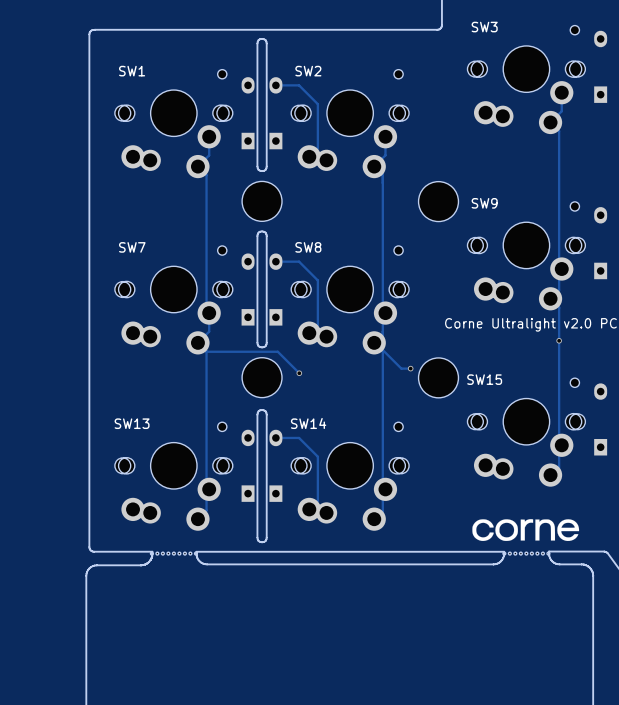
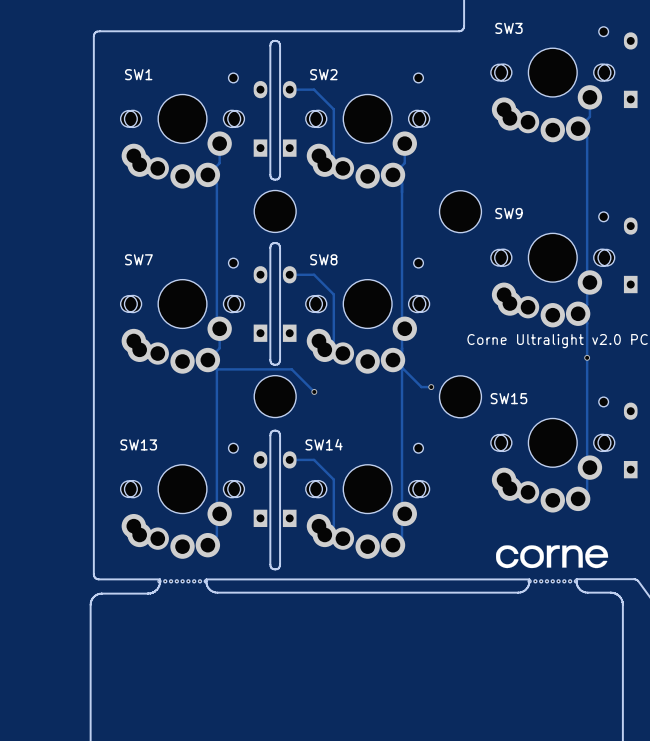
SW3 footprint: [467, 25, 586, 135] -> [490, 26, 615, 143]
SW1 footprint: [114, 69, 233, 179] -> [120, 73, 245, 189]
SW2 footprint: [291, 69, 410, 179] -> [305, 73, 430, 189]
SW9 footprint: [467, 201, 586, 311] -> [490, 211, 615, 328]
SW7 footprint: [114, 245, 233, 355] -> [120, 258, 245, 374]
SW8 footprint: [291, 245, 410, 355] -> [305, 258, 430, 374]
SW15 footprint: [467, 378, 586, 487] -> [490, 397, 615, 513]
SW13 footprint: [114, 422, 233, 531] -> [120, 443, 245, 559]
SW14 footprint: [291, 422, 410, 531] -> [305, 443, 430, 559]

